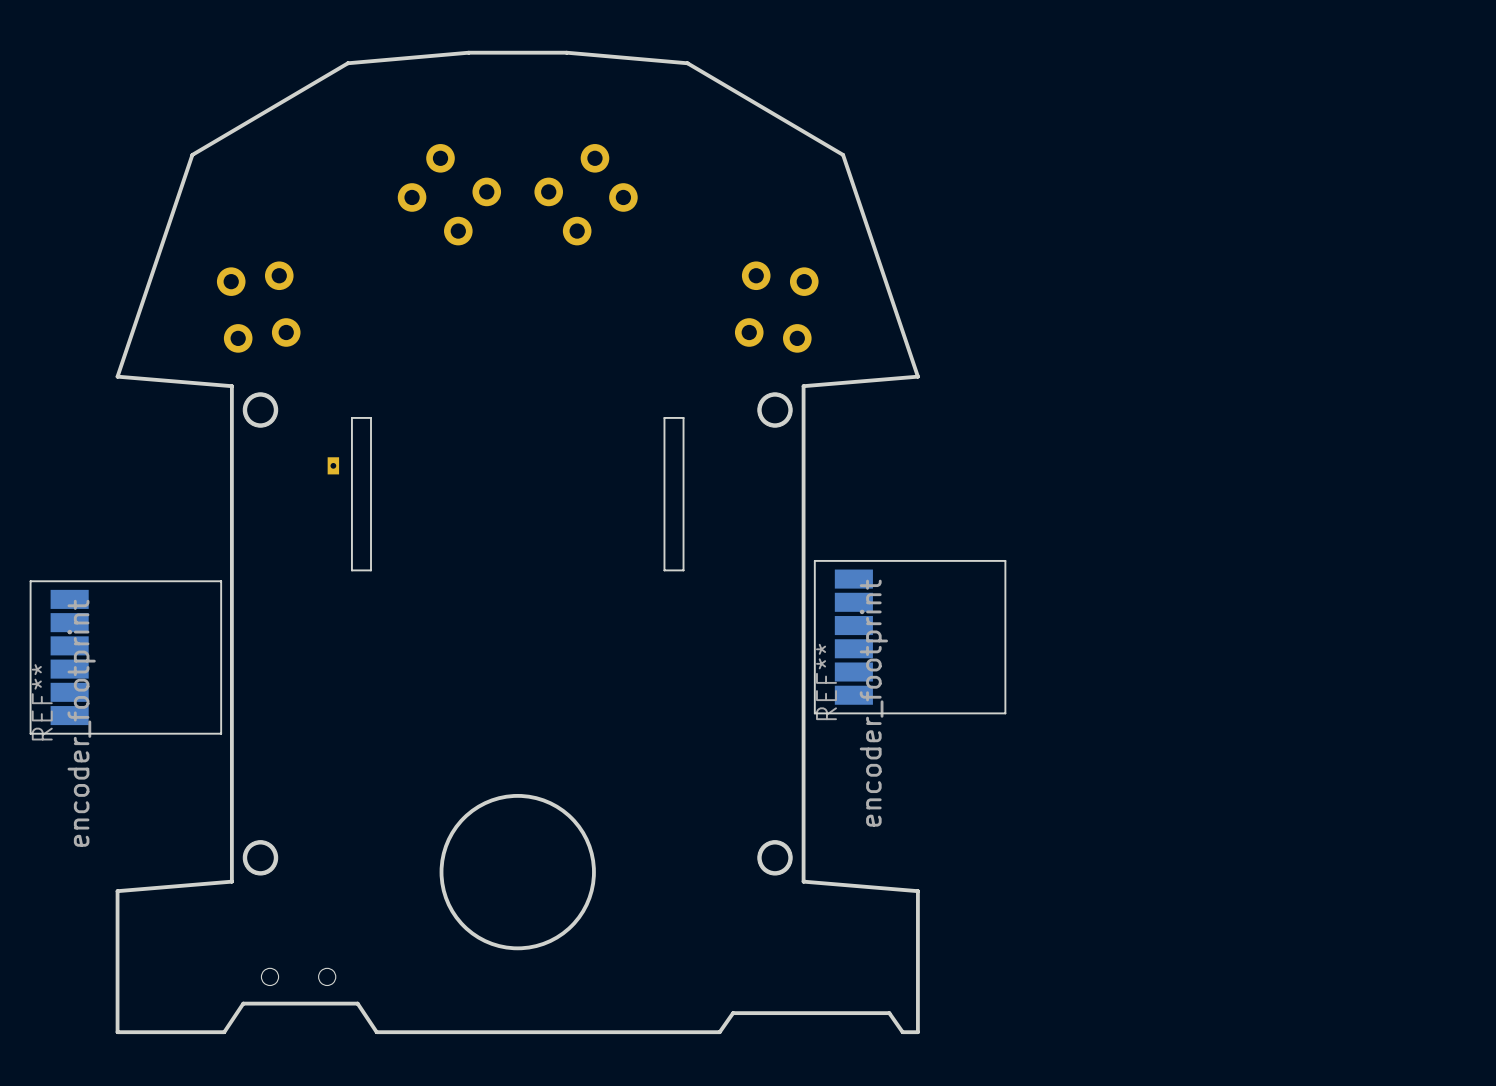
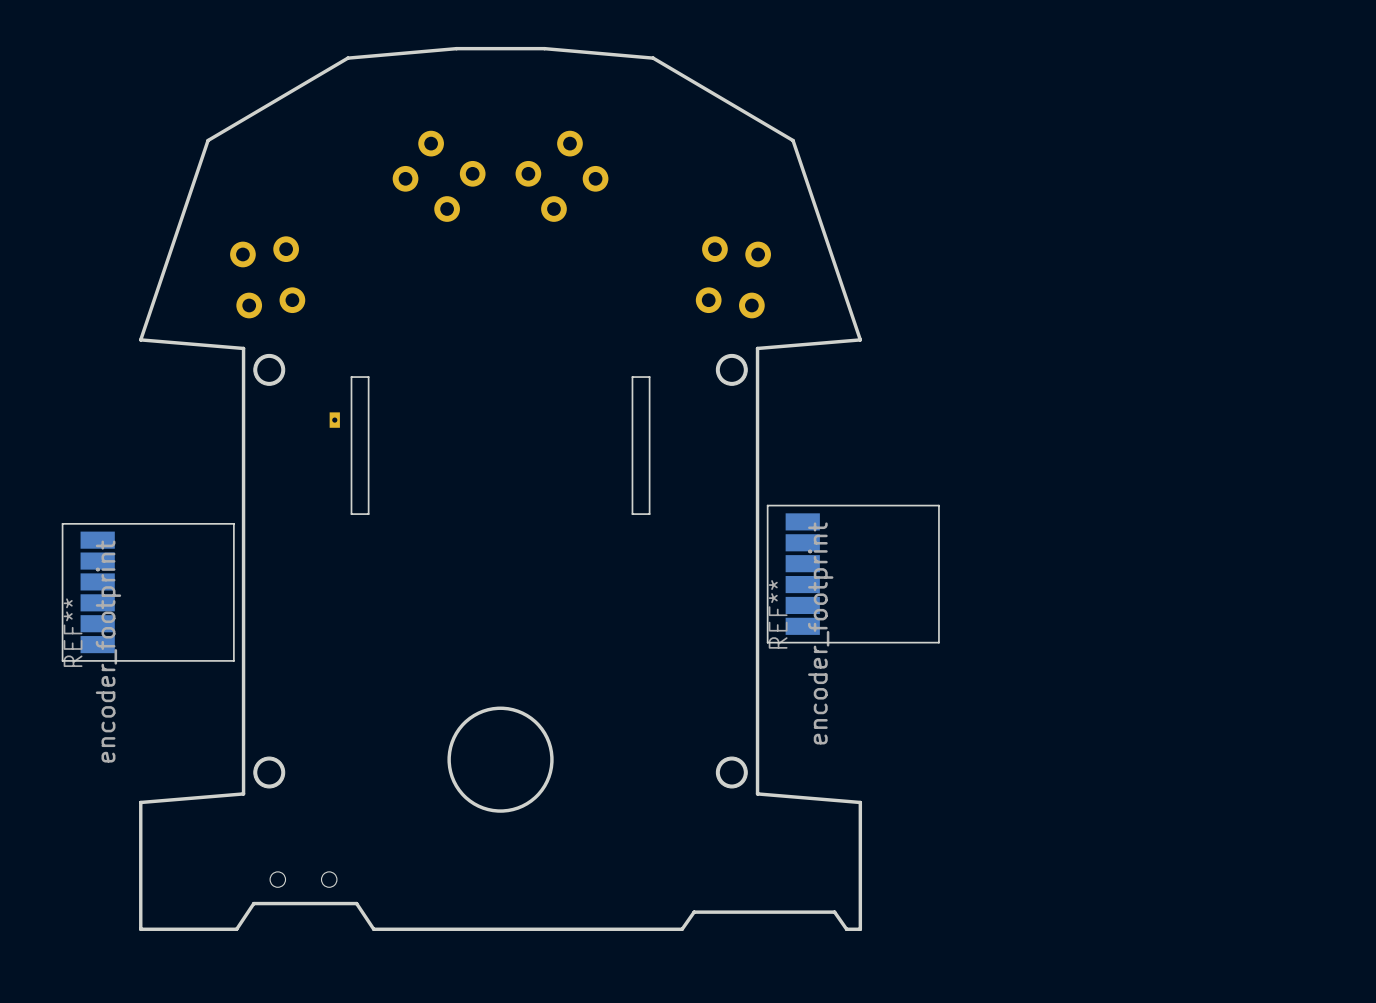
round board edge: none -> [447, 706, 554, 813]
round board edge: [439, 793, 596, 951] -> none

